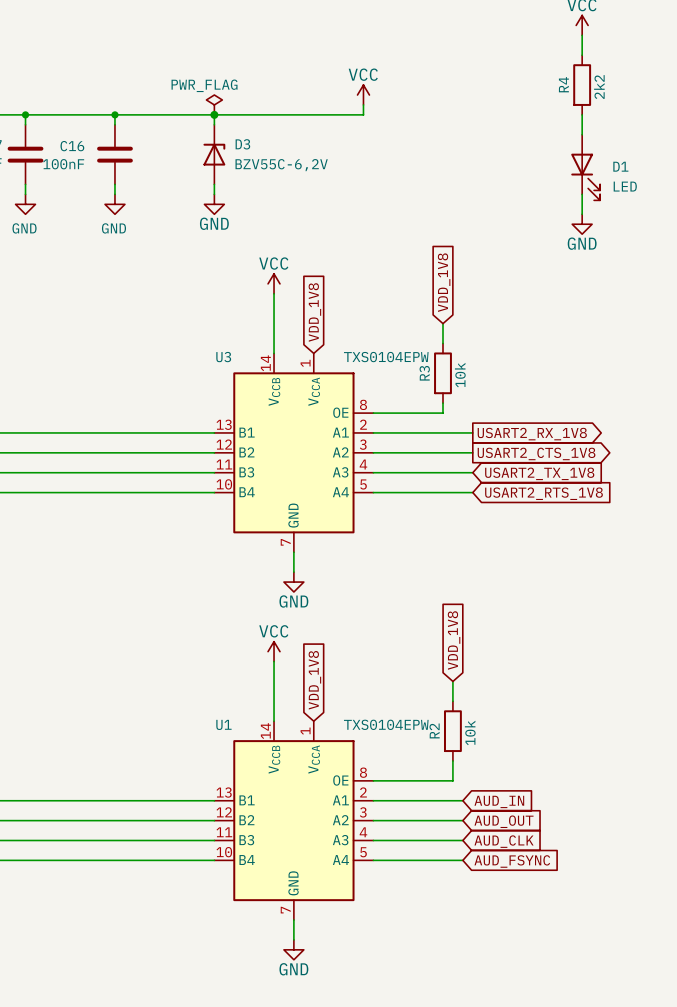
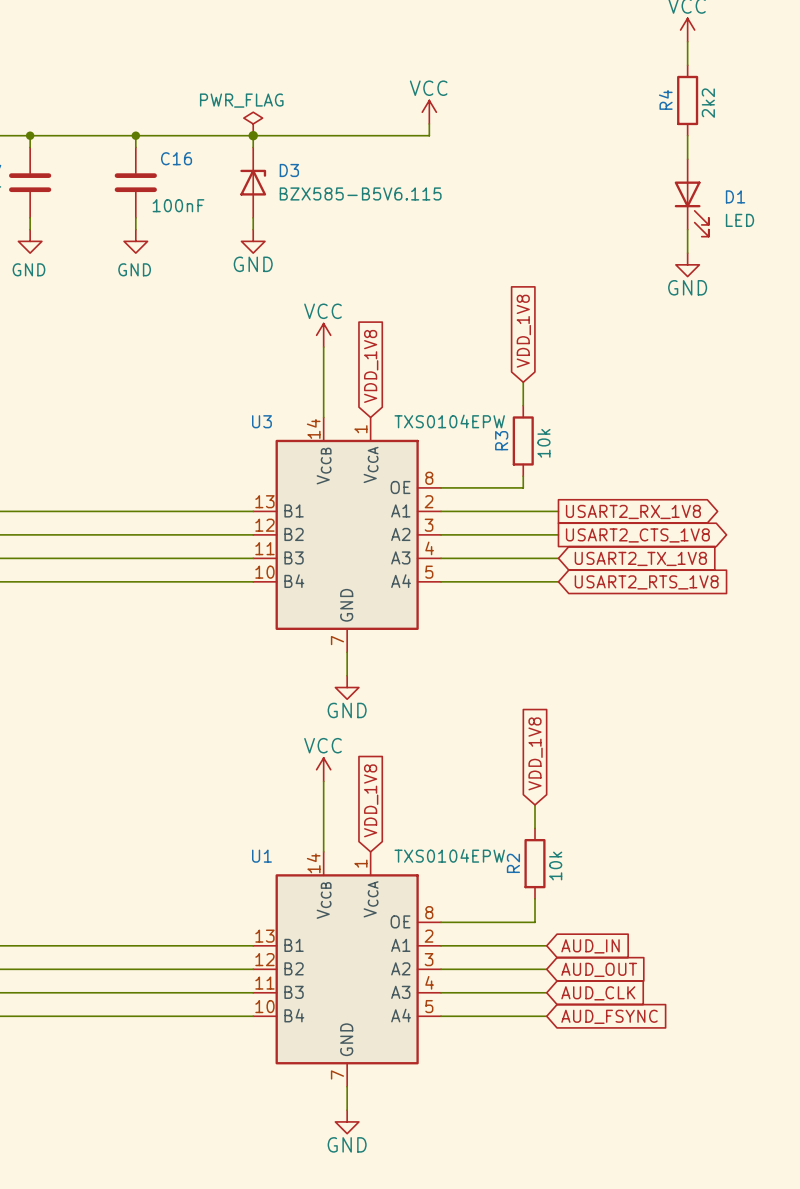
C16 name position: C16 (72, 146) -> C16 (176, 158)
C16 value position: 100nF (63, 164) -> 100nF (178, 205)
D3 value: BZV55C-6,2V (281, 165) -> BZX585-B5V6.115 (360, 193)

